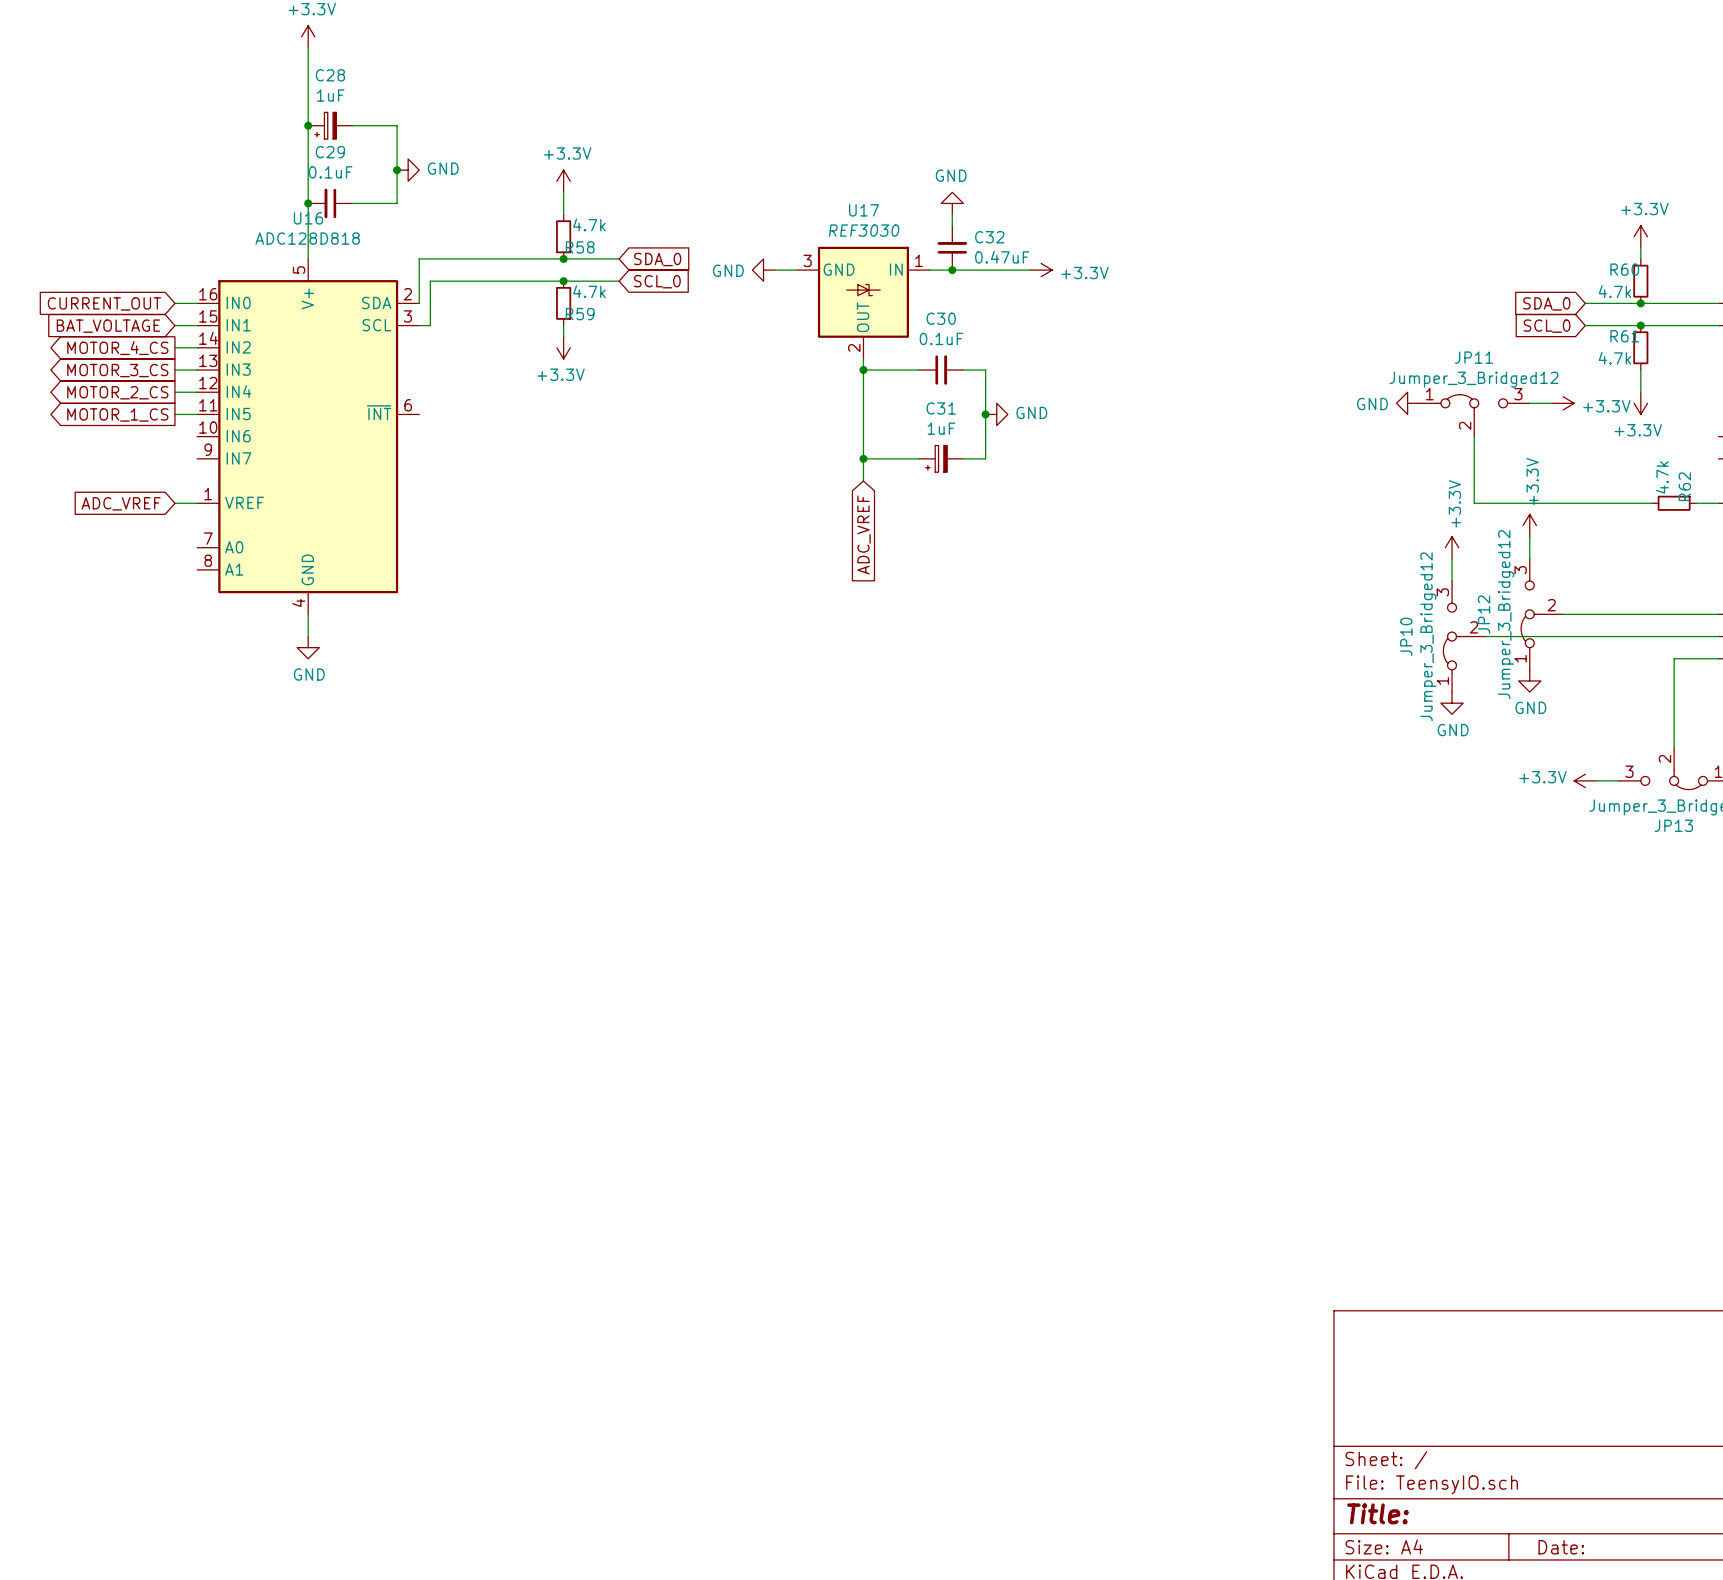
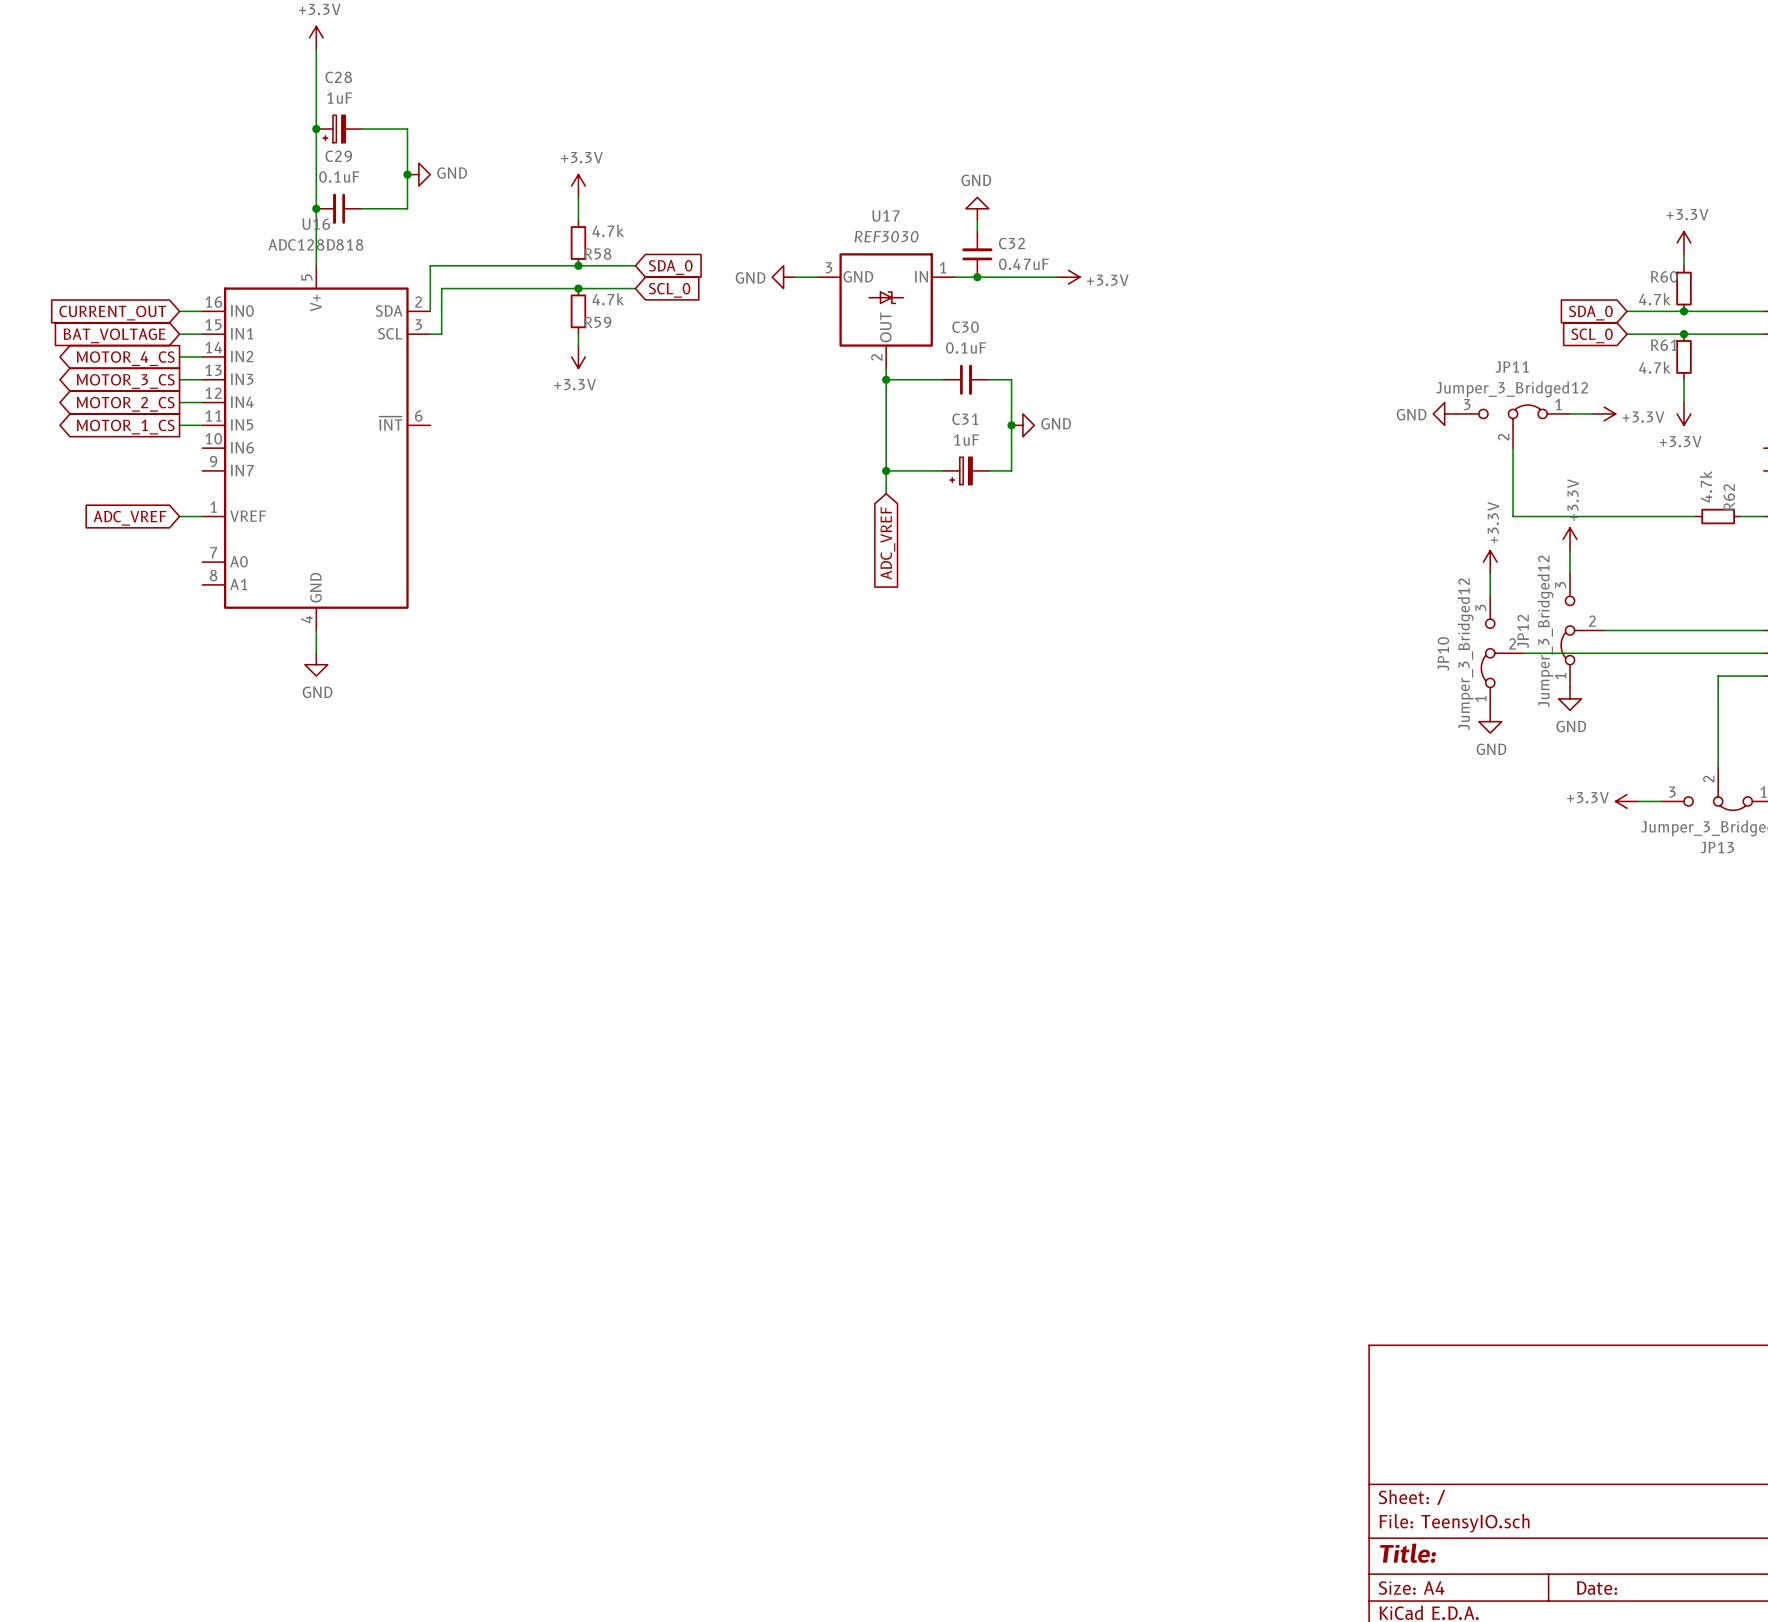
JP11 flip: as is (1474, 404) -> left-right (1513, 415)

